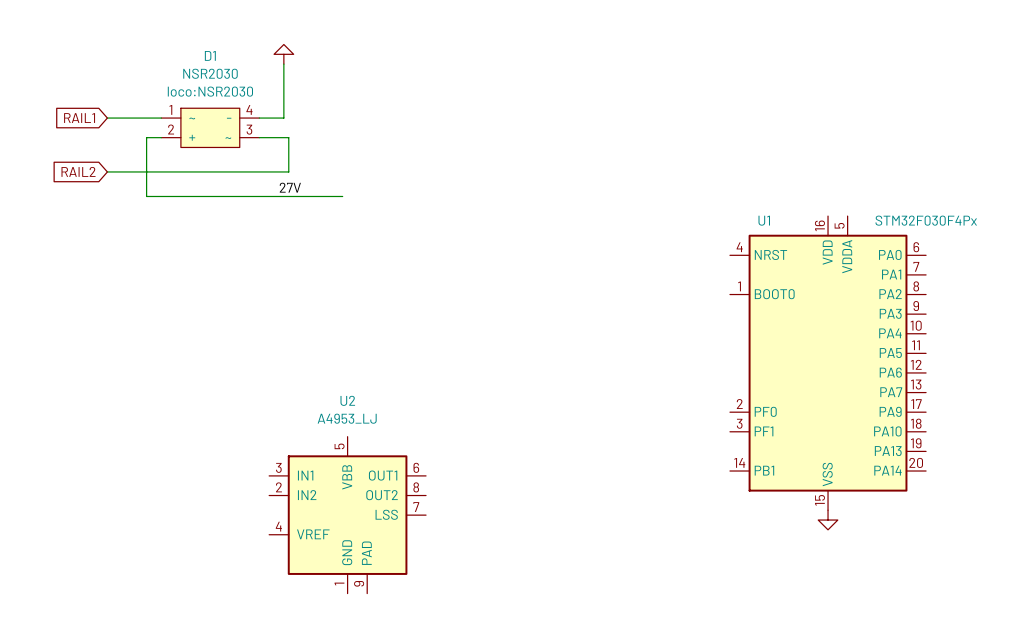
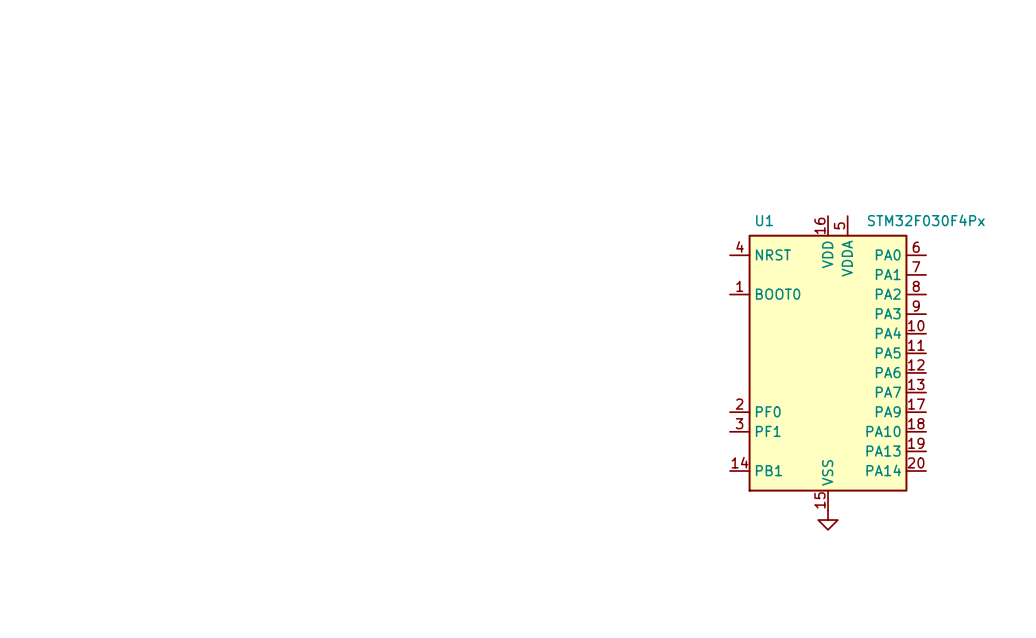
power symbol: (283, 54) -> none
wire: (283, 64) (283, 118) (259, 118) -> none
global label: RAIL1 (79, 118) -> none
wire: (107, 118) (161, 118) -> none
D1: NSR2030 (210, 127) -> none
wire: (161, 137) (146, 137) (146, 196) (342, 196) -> none
wire: (259, 137) (288, 137) (288, 171) (107, 171) -> none
global label: RAIL2 (78, 171) -> none
label: 27V (290, 187) -> none
U2: A4953_LJ (347, 515) -> none

